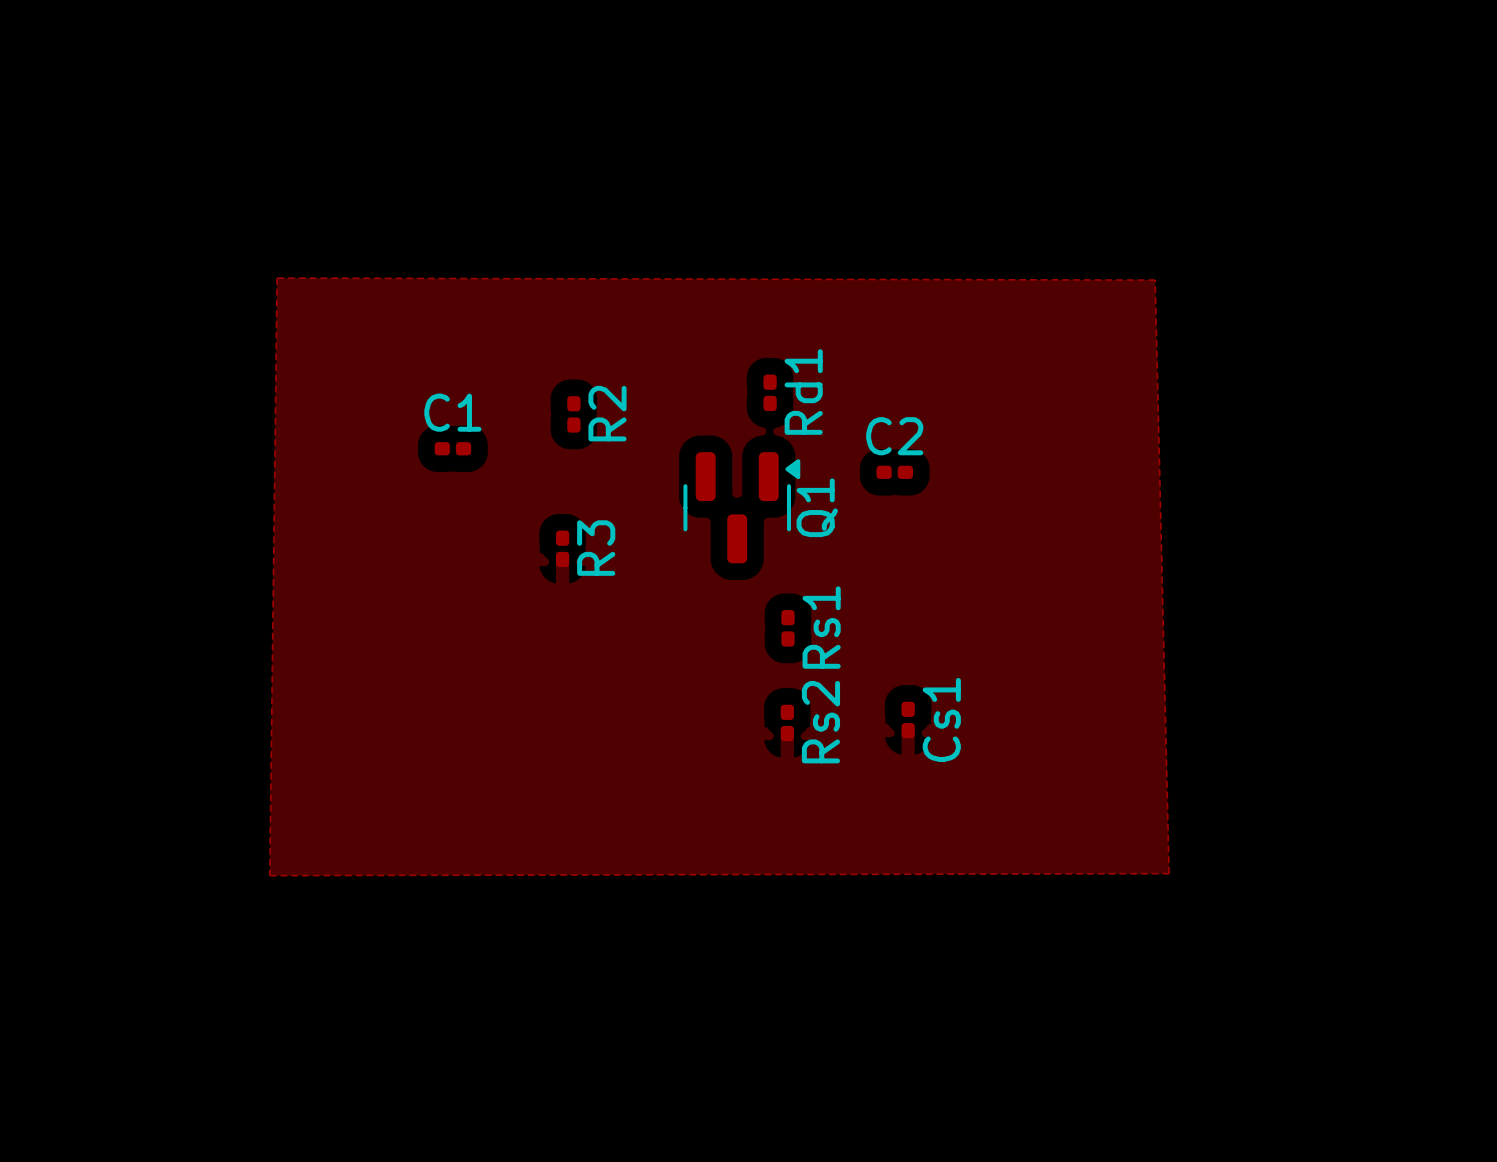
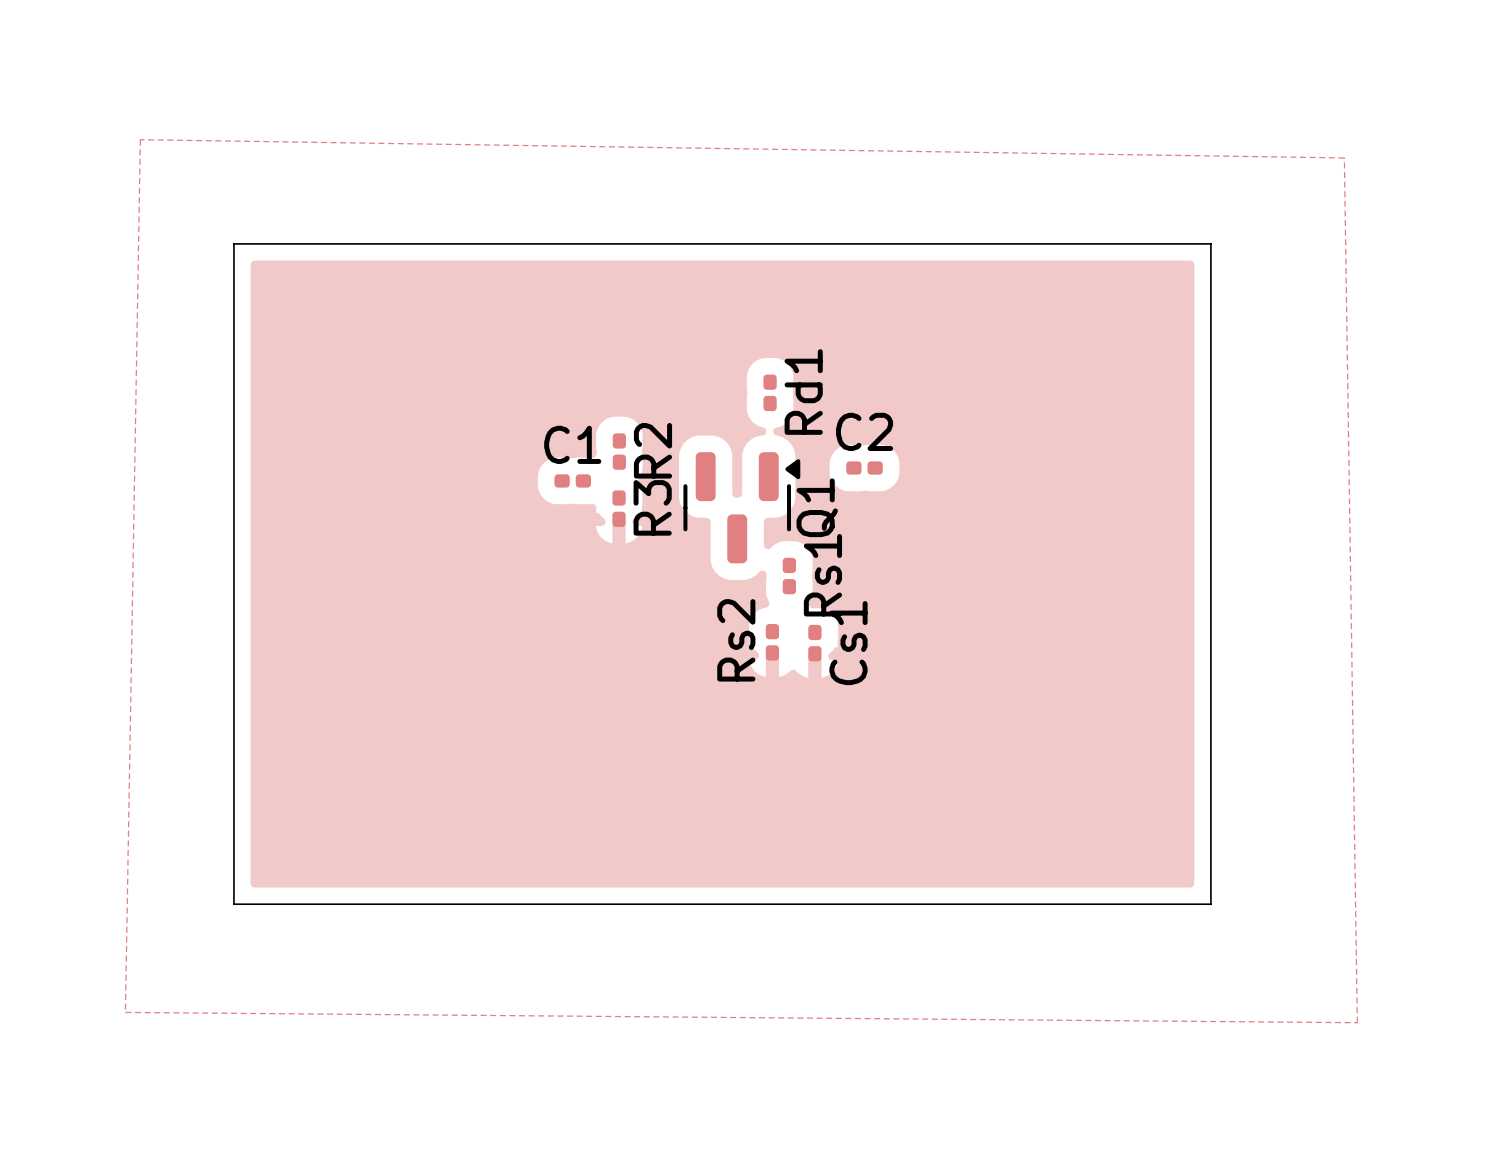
zone outline: none -> (140, 139) (125, 1012) (1357, 1022) (1344, 157) (140, 139)
board edge: none -> (233, 243) (1210, 243) (1210, 904) (233, 904) (233, 243)
zone outline: (277, 278) (269, 875) (1169, 873) (1155, 280) (277, 278) -> none
R2 position: (573, 414) -> (619, 451)
C1 position: (452, 448) -> (572, 480)
C2 position: (894, 472) -> (864, 468)
R3 position: (562, 548) -> (619, 508)
Rs1 position: (788, 628) -> (789, 576)
Cs1 position: (908, 719) -> (814, 643)
Rs2 position: (787, 722) -> (772, 642)
Rs2 name position: Rs2 (820, 722) -> Rs2 (736, 640)

